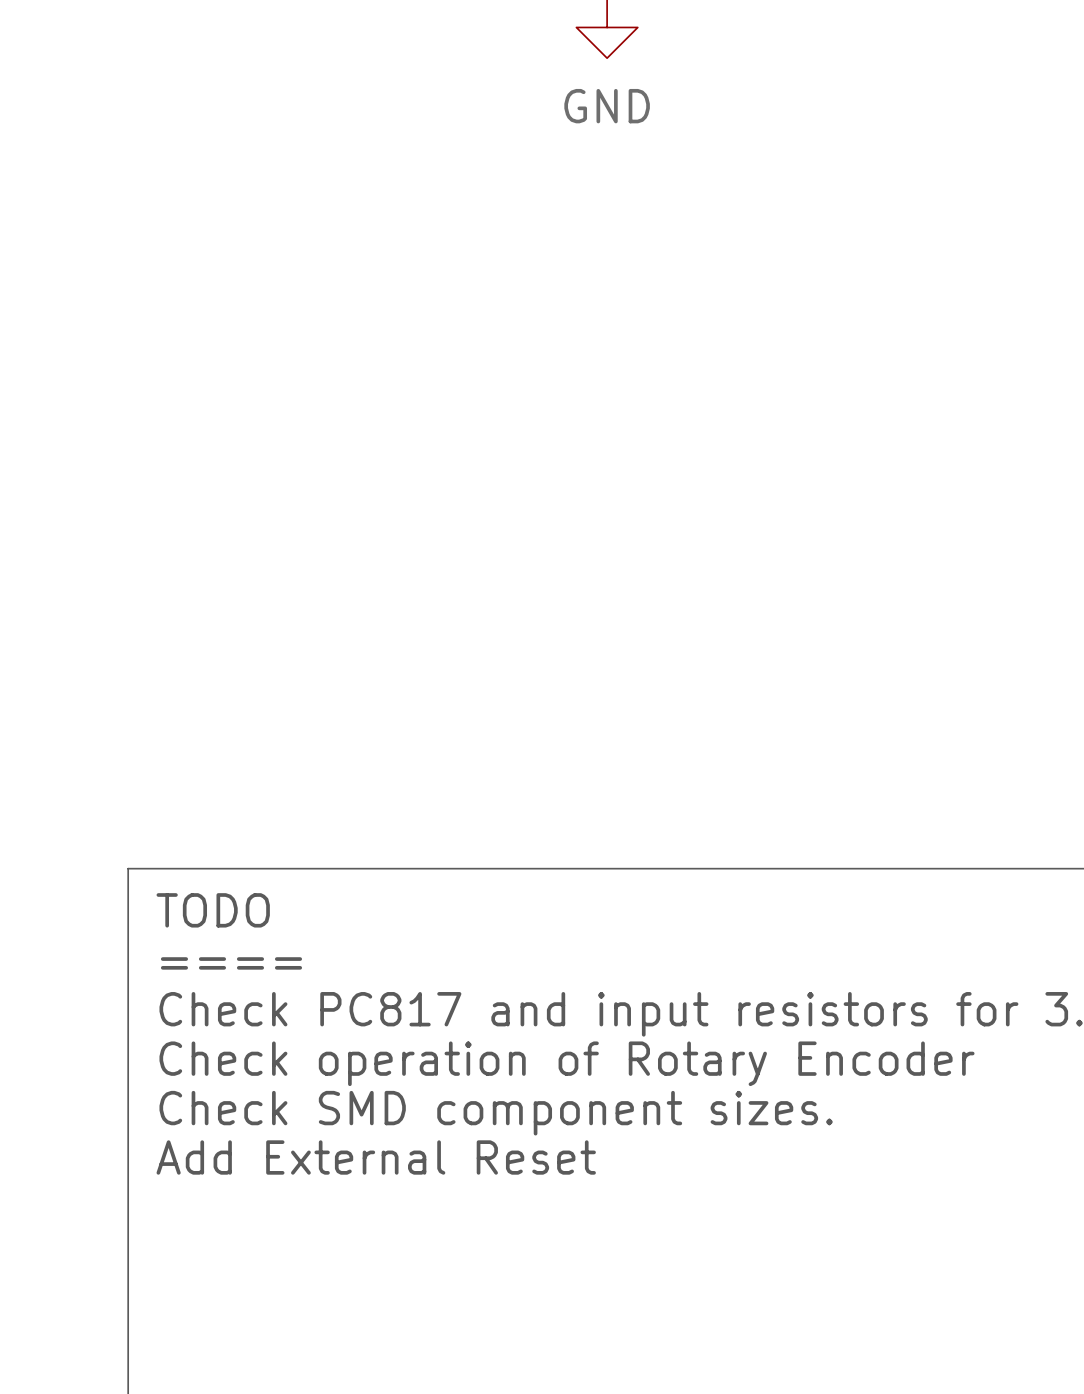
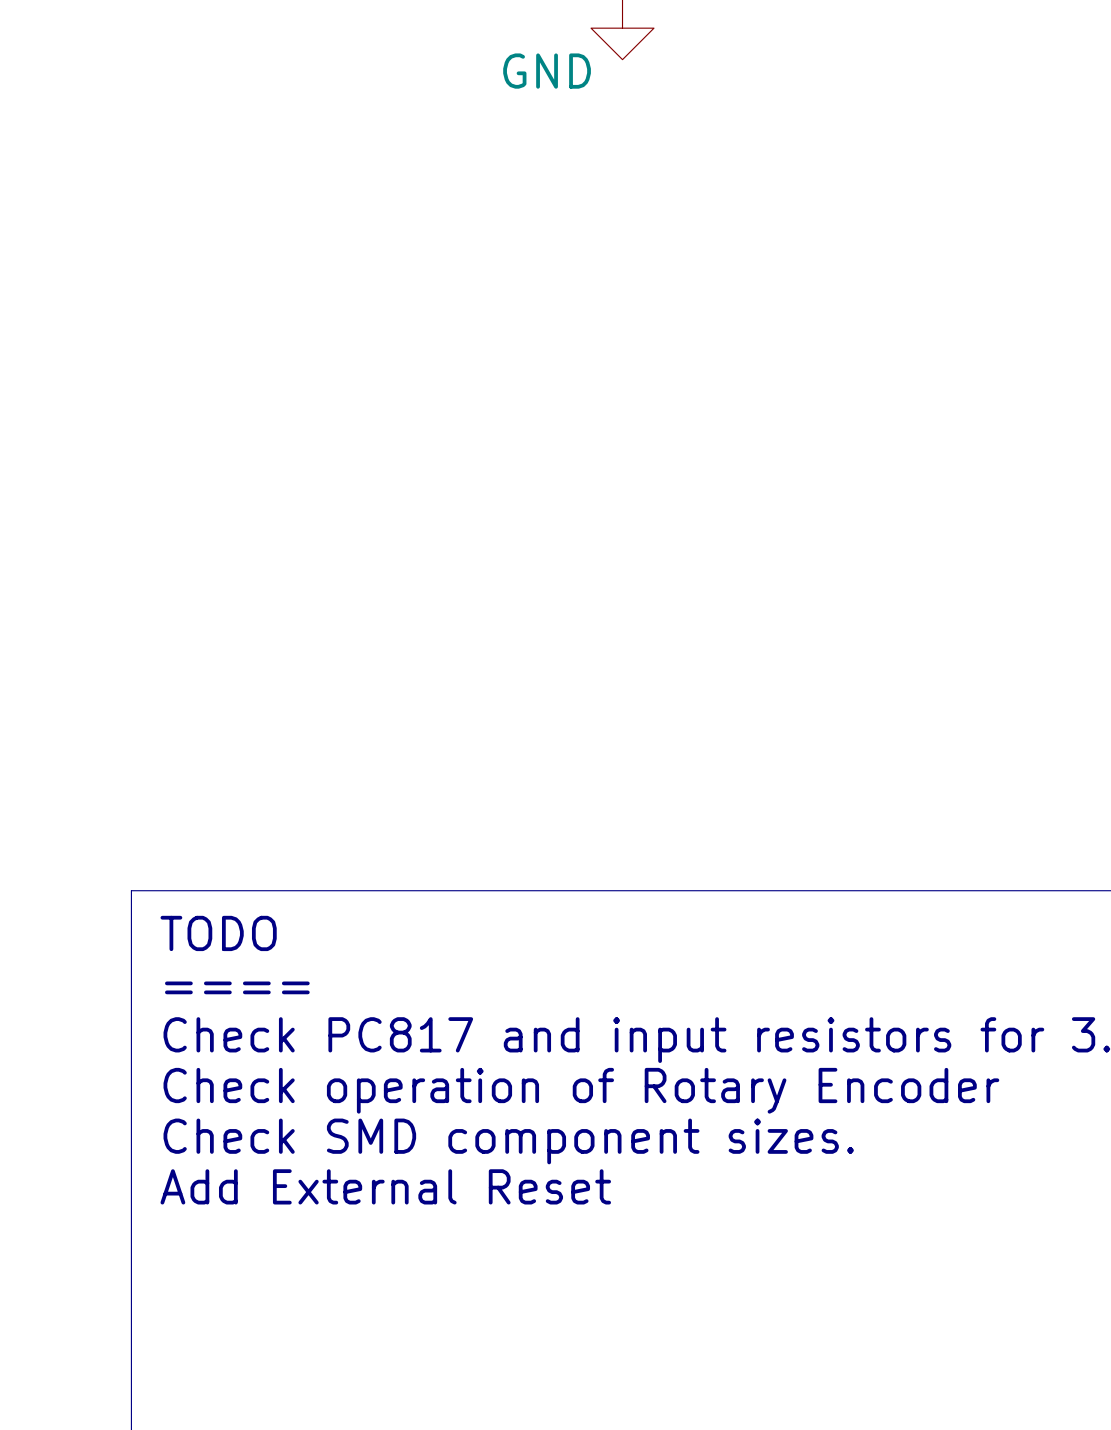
power symbol text position: GND (607, 106) -> GND (547, 71)

